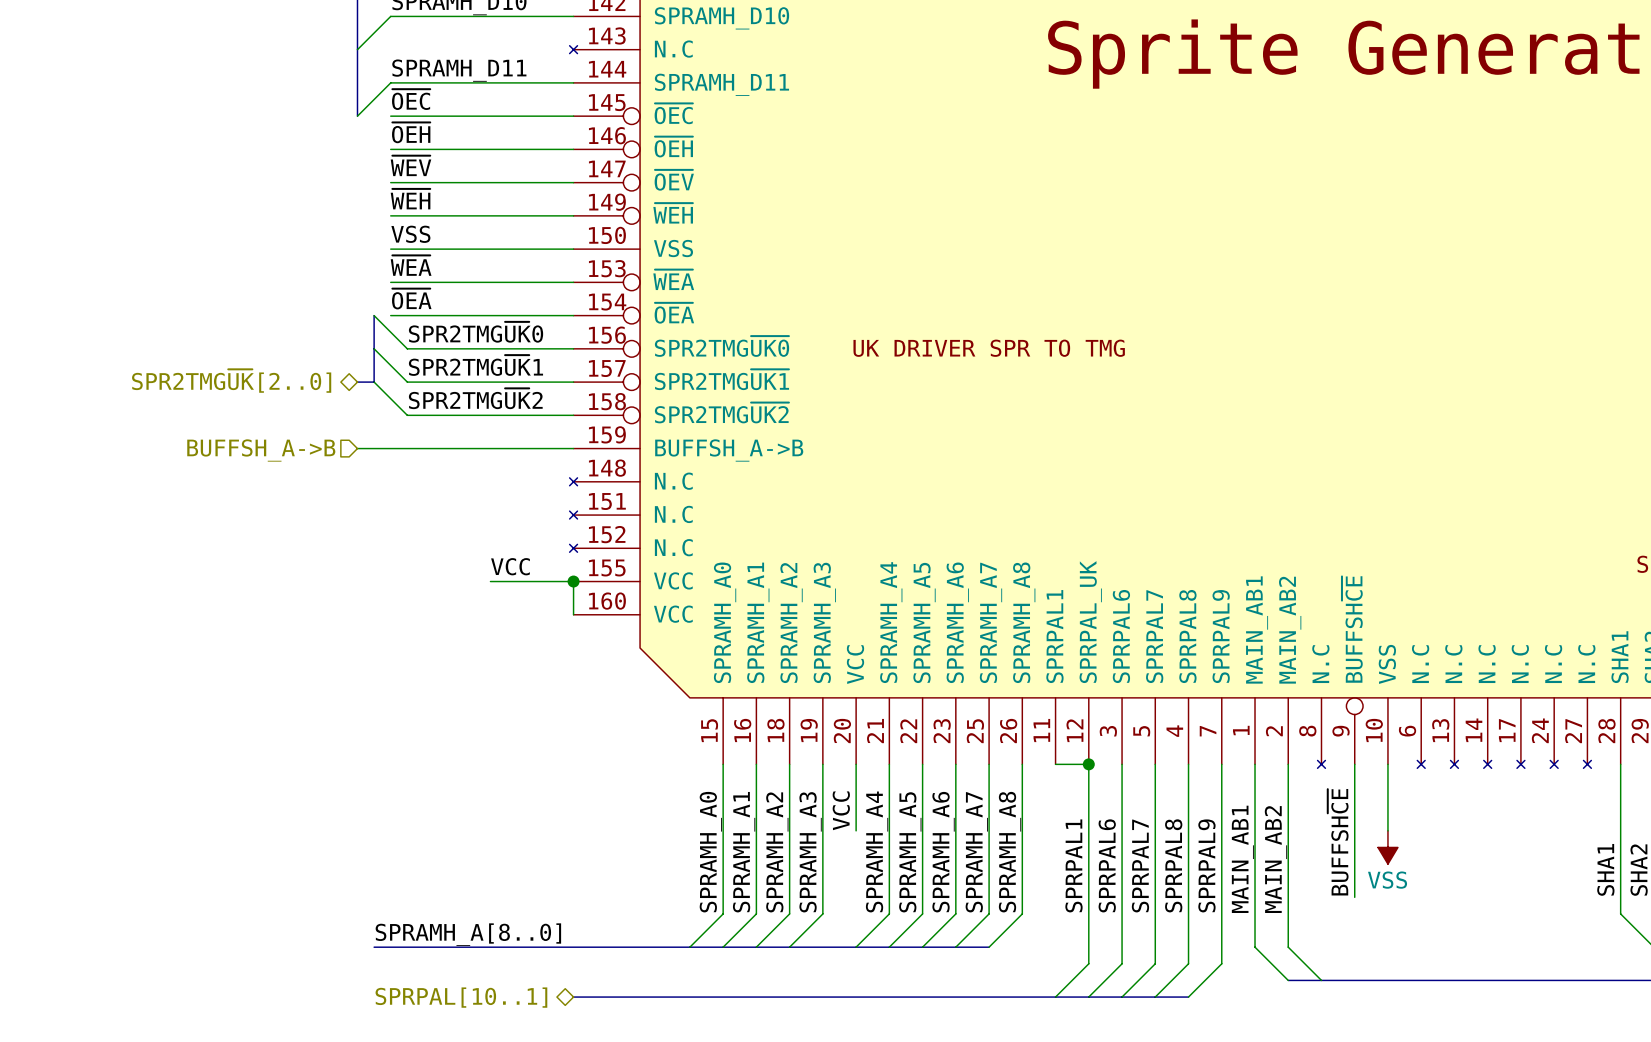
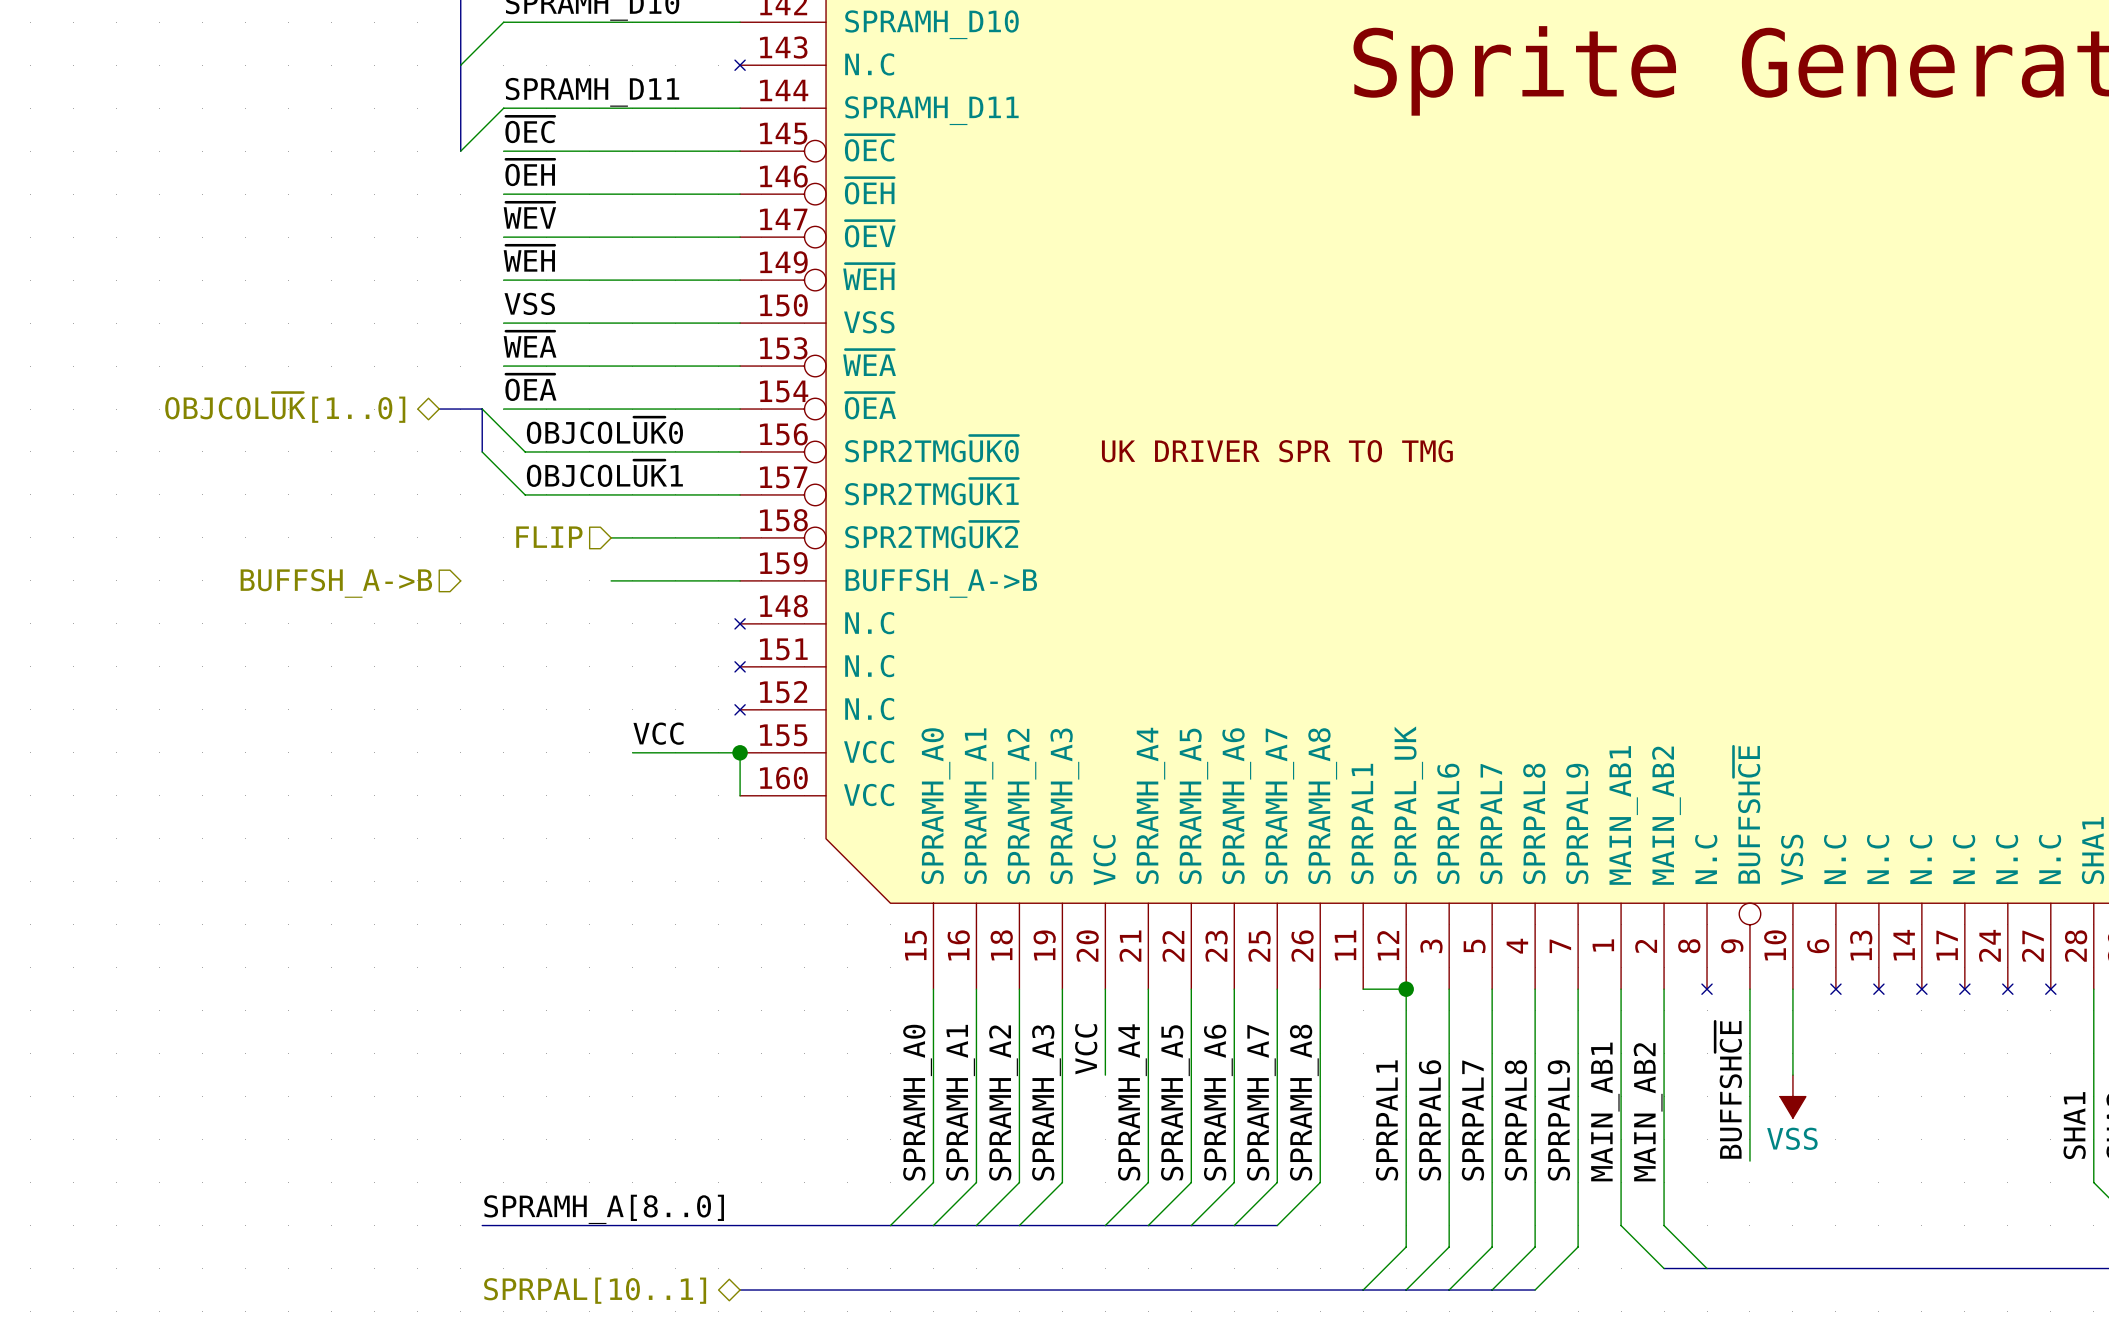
hierarchical label: none -> OBJCOL~{UK}[1..0] (285, 407)
bus: none -> (439, 409) (482, 409)
label: SPR2TMG~{UK}0 (476, 332) -> OBJCOL~{UK}0 (604, 430)
bus: (374, 348) (374, 382) (357, 382) -> none
label: SPR2TMG~{UK}1 (475, 365) -> OBJCOL~{UK}1 (604, 473)
hierarchical label: SPR2TMG~{UK}[2..0] (231, 381) -> none
wire: (374, 382) (407, 415) (473, 415) -> none
label: SPR2TMG~{UK}2 (475, 398) -> none
hierarchical label: none -> FLIP (549, 537)
wire: (357, 448) (473, 448) -> none

